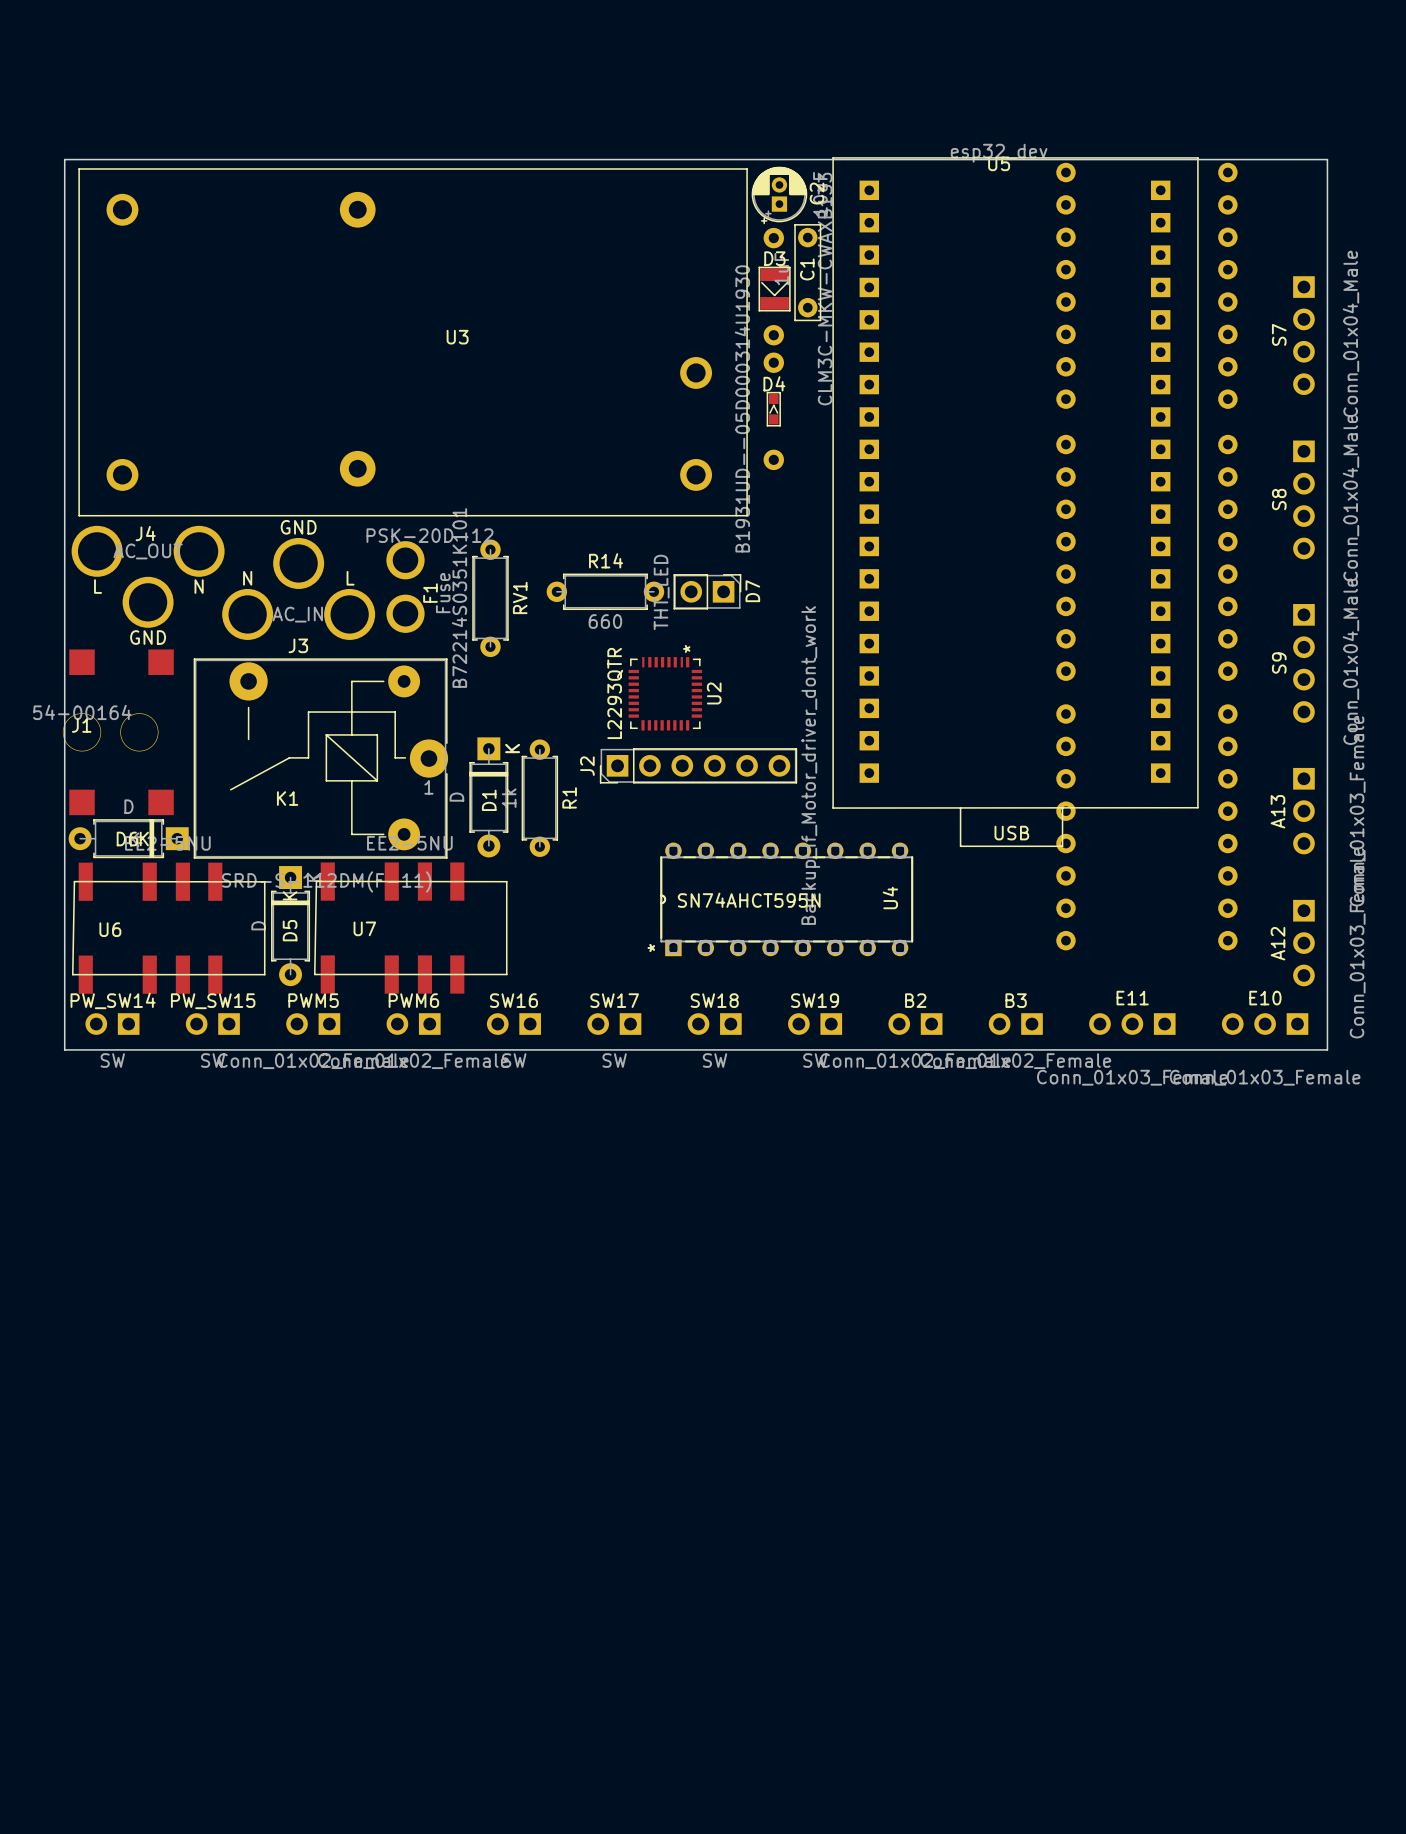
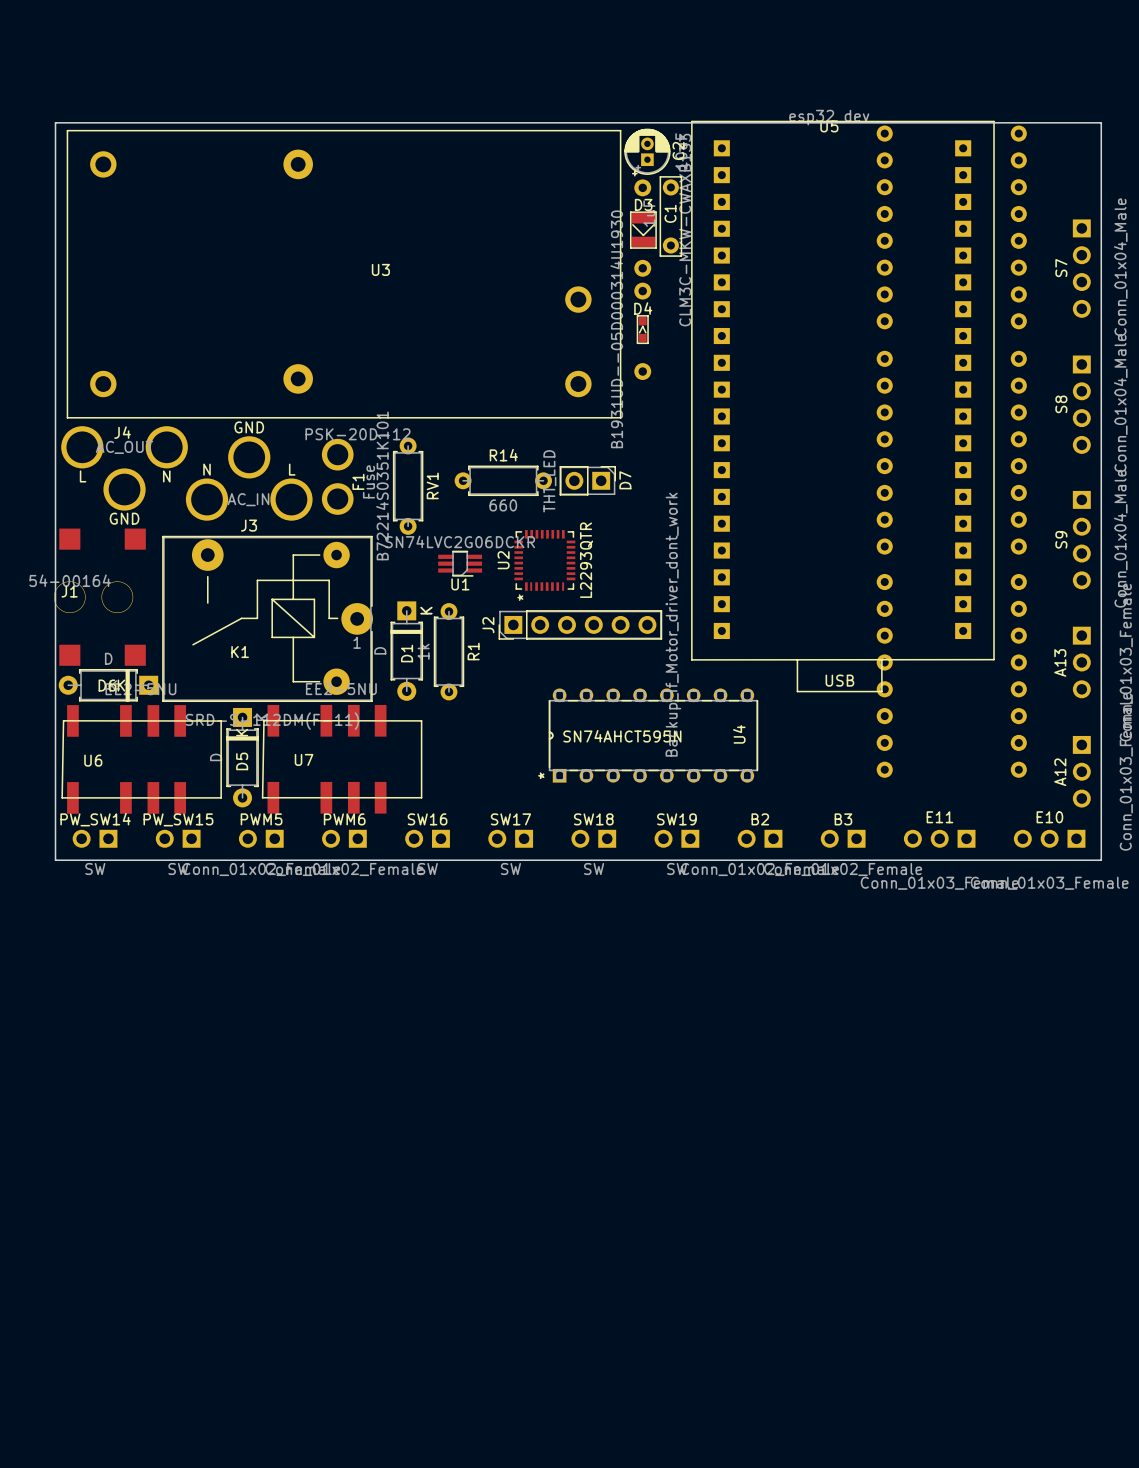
U1: none -> SN74LVC2G06DCKR (460, 563)
U2 rotation: 0° (665, 693) -> 180° (544, 560)

